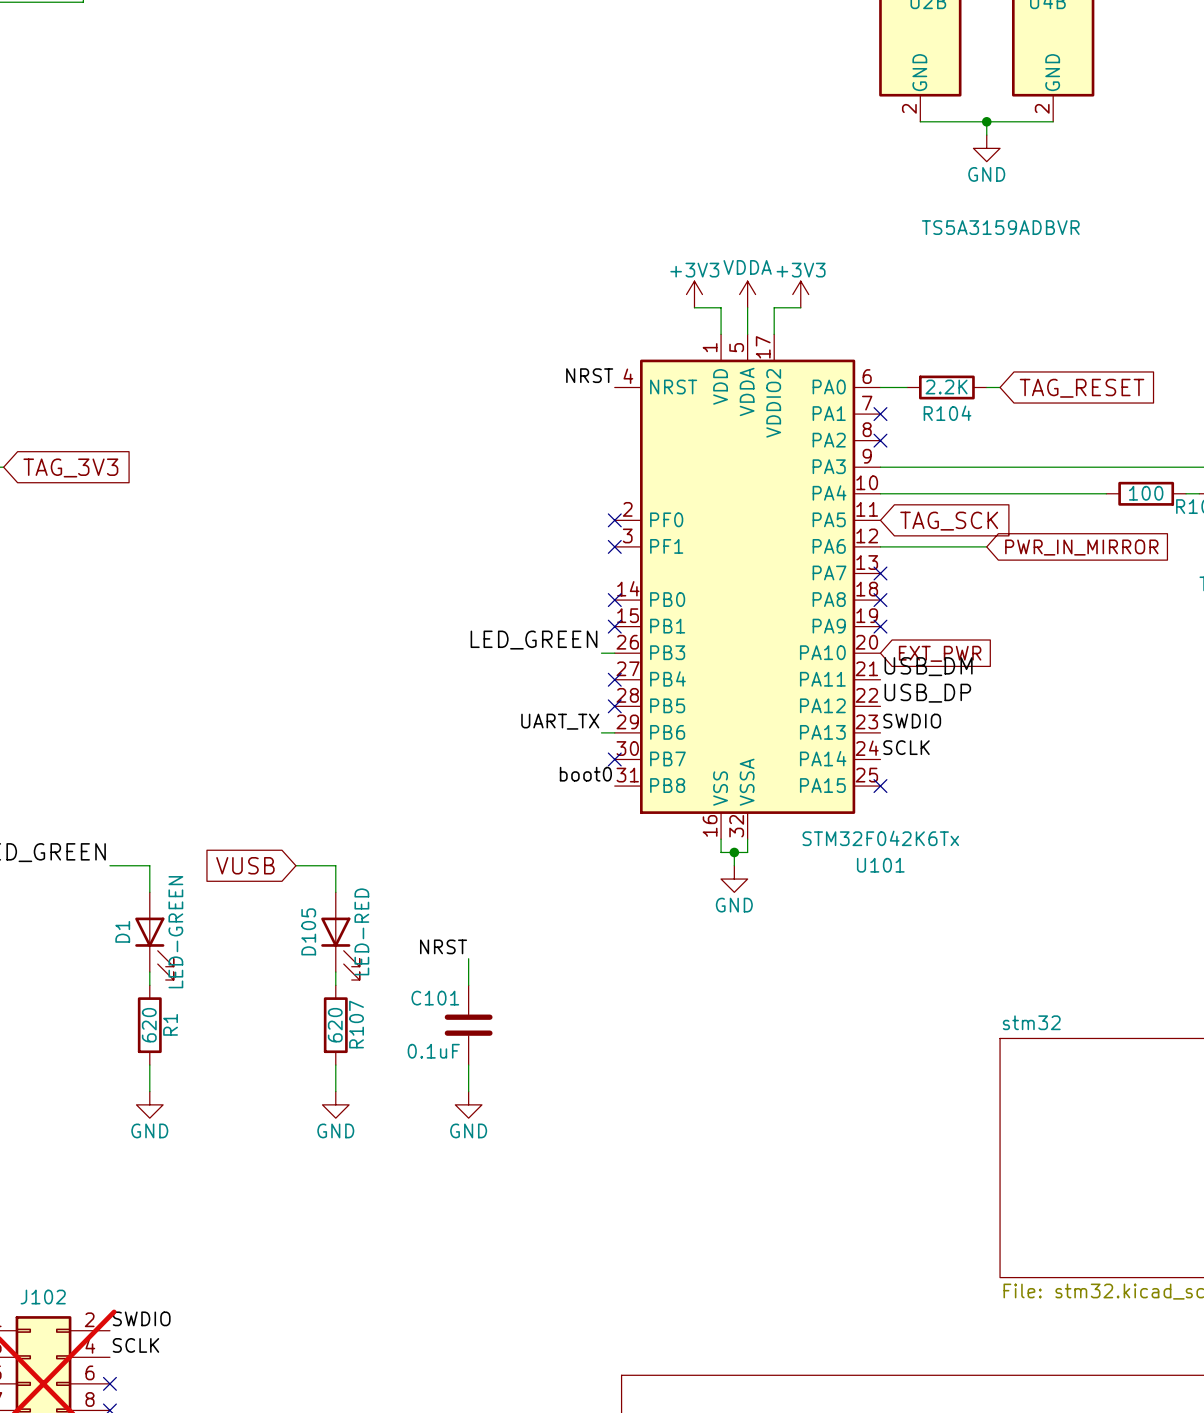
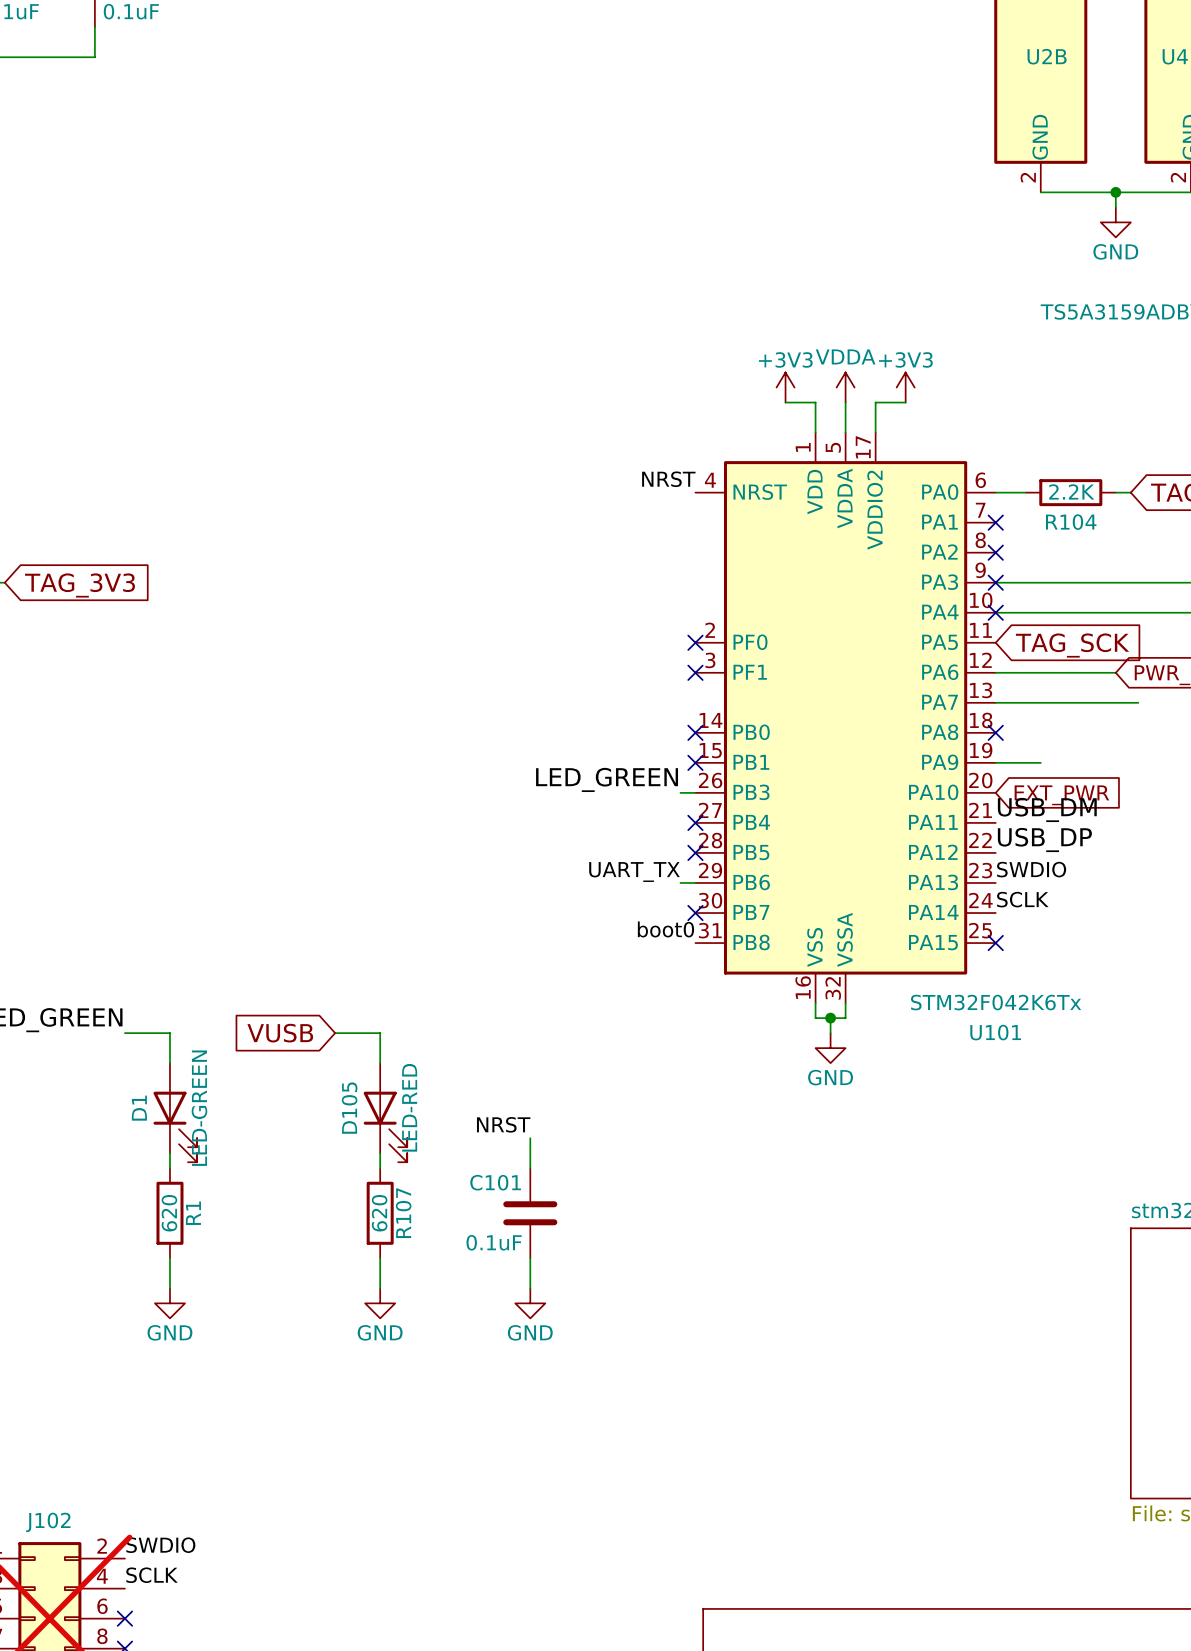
no-connect mark: none -> (995, 582)
no-connect mark: none -> (995, 612)
wire: none -> (995, 702) (1138, 702)
no-connect mark: (880, 573) -> none
wire: none -> (995, 762) (1040, 762)
no-connect mark: (880, 626) -> none

